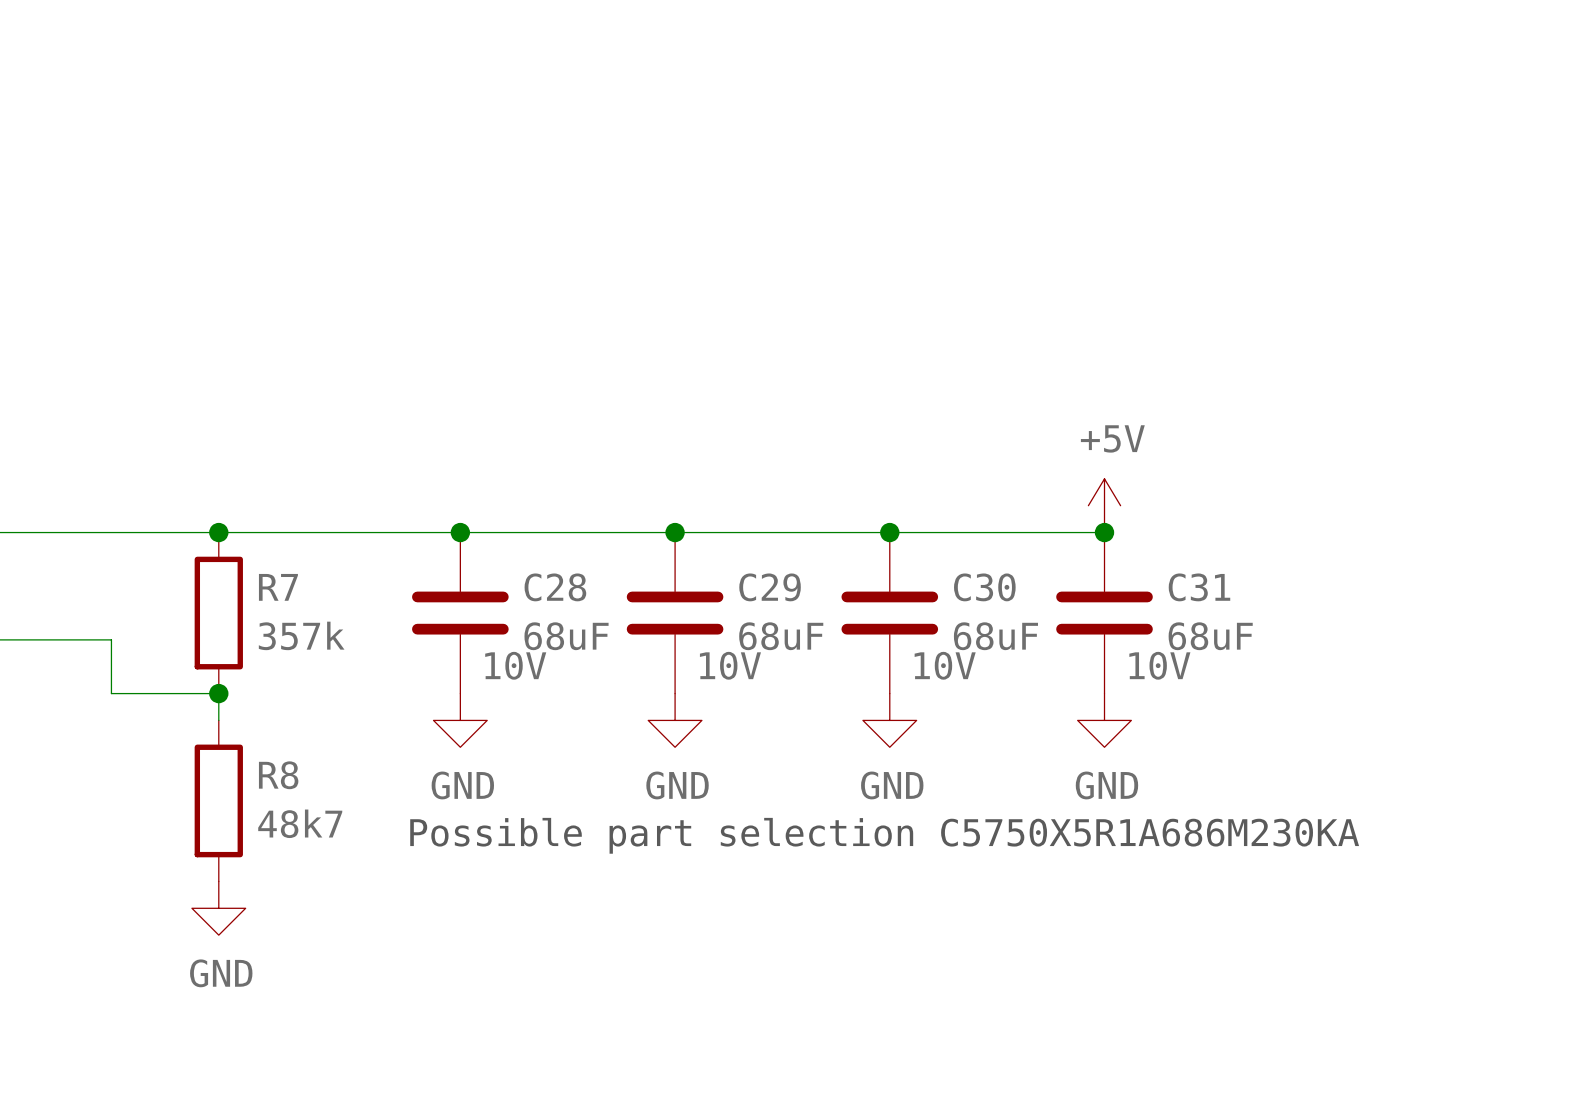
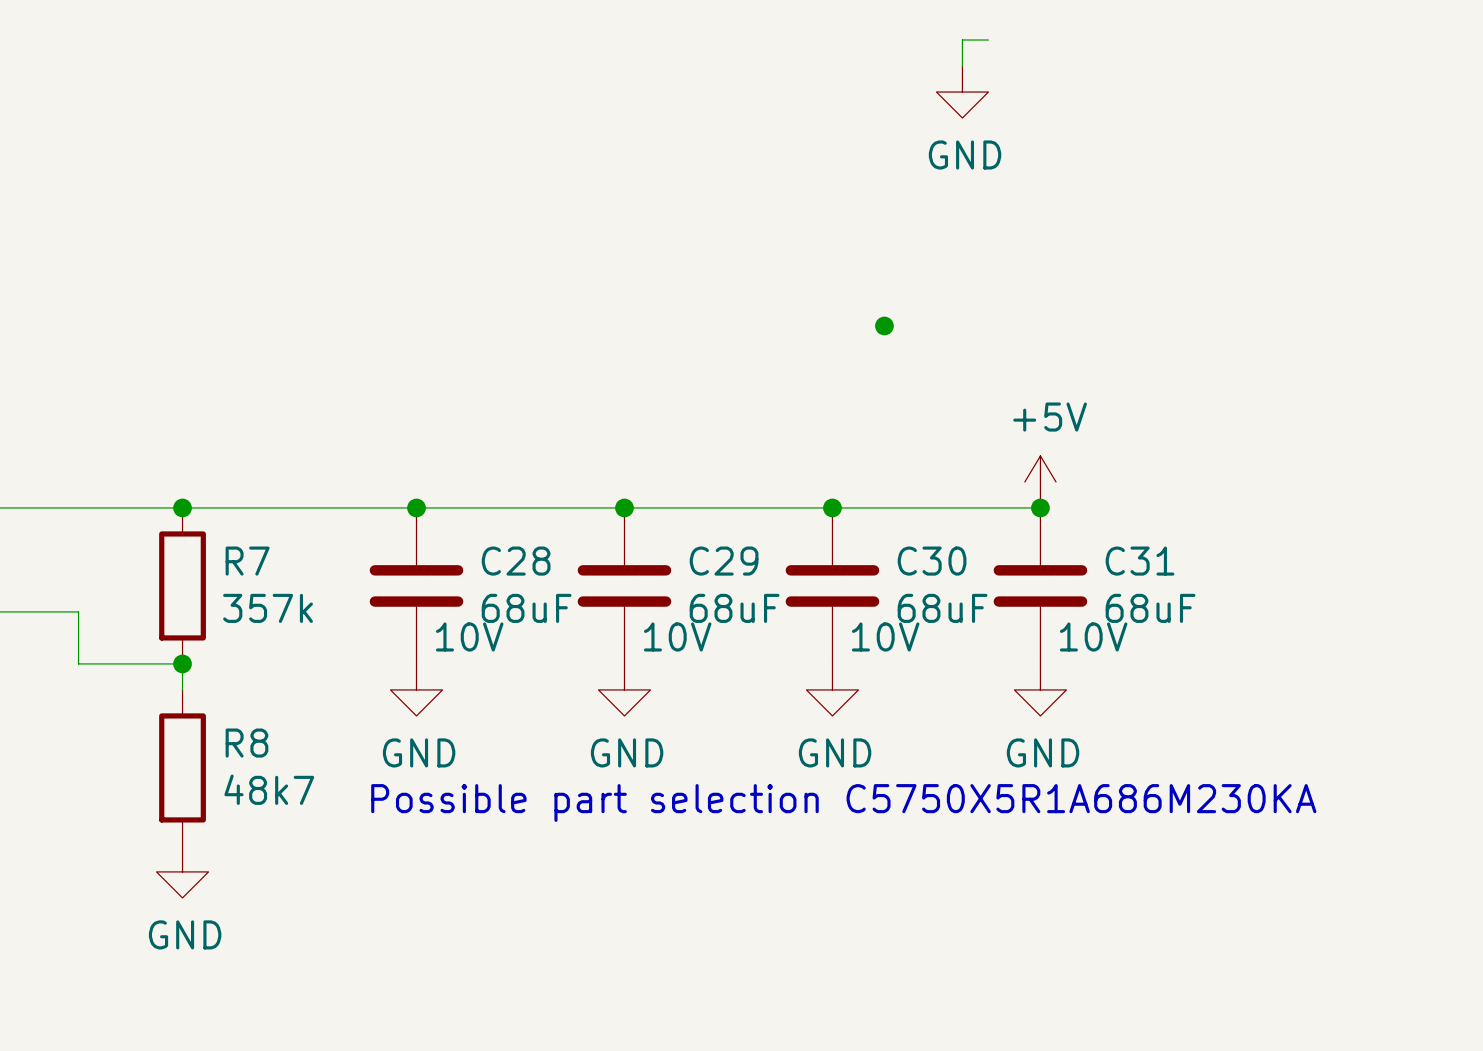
wire: none -> (988, 40) (962, 40) (962, 66)
power symbol: none -> GND (962, 92)
junction: none -> (884, 325)

